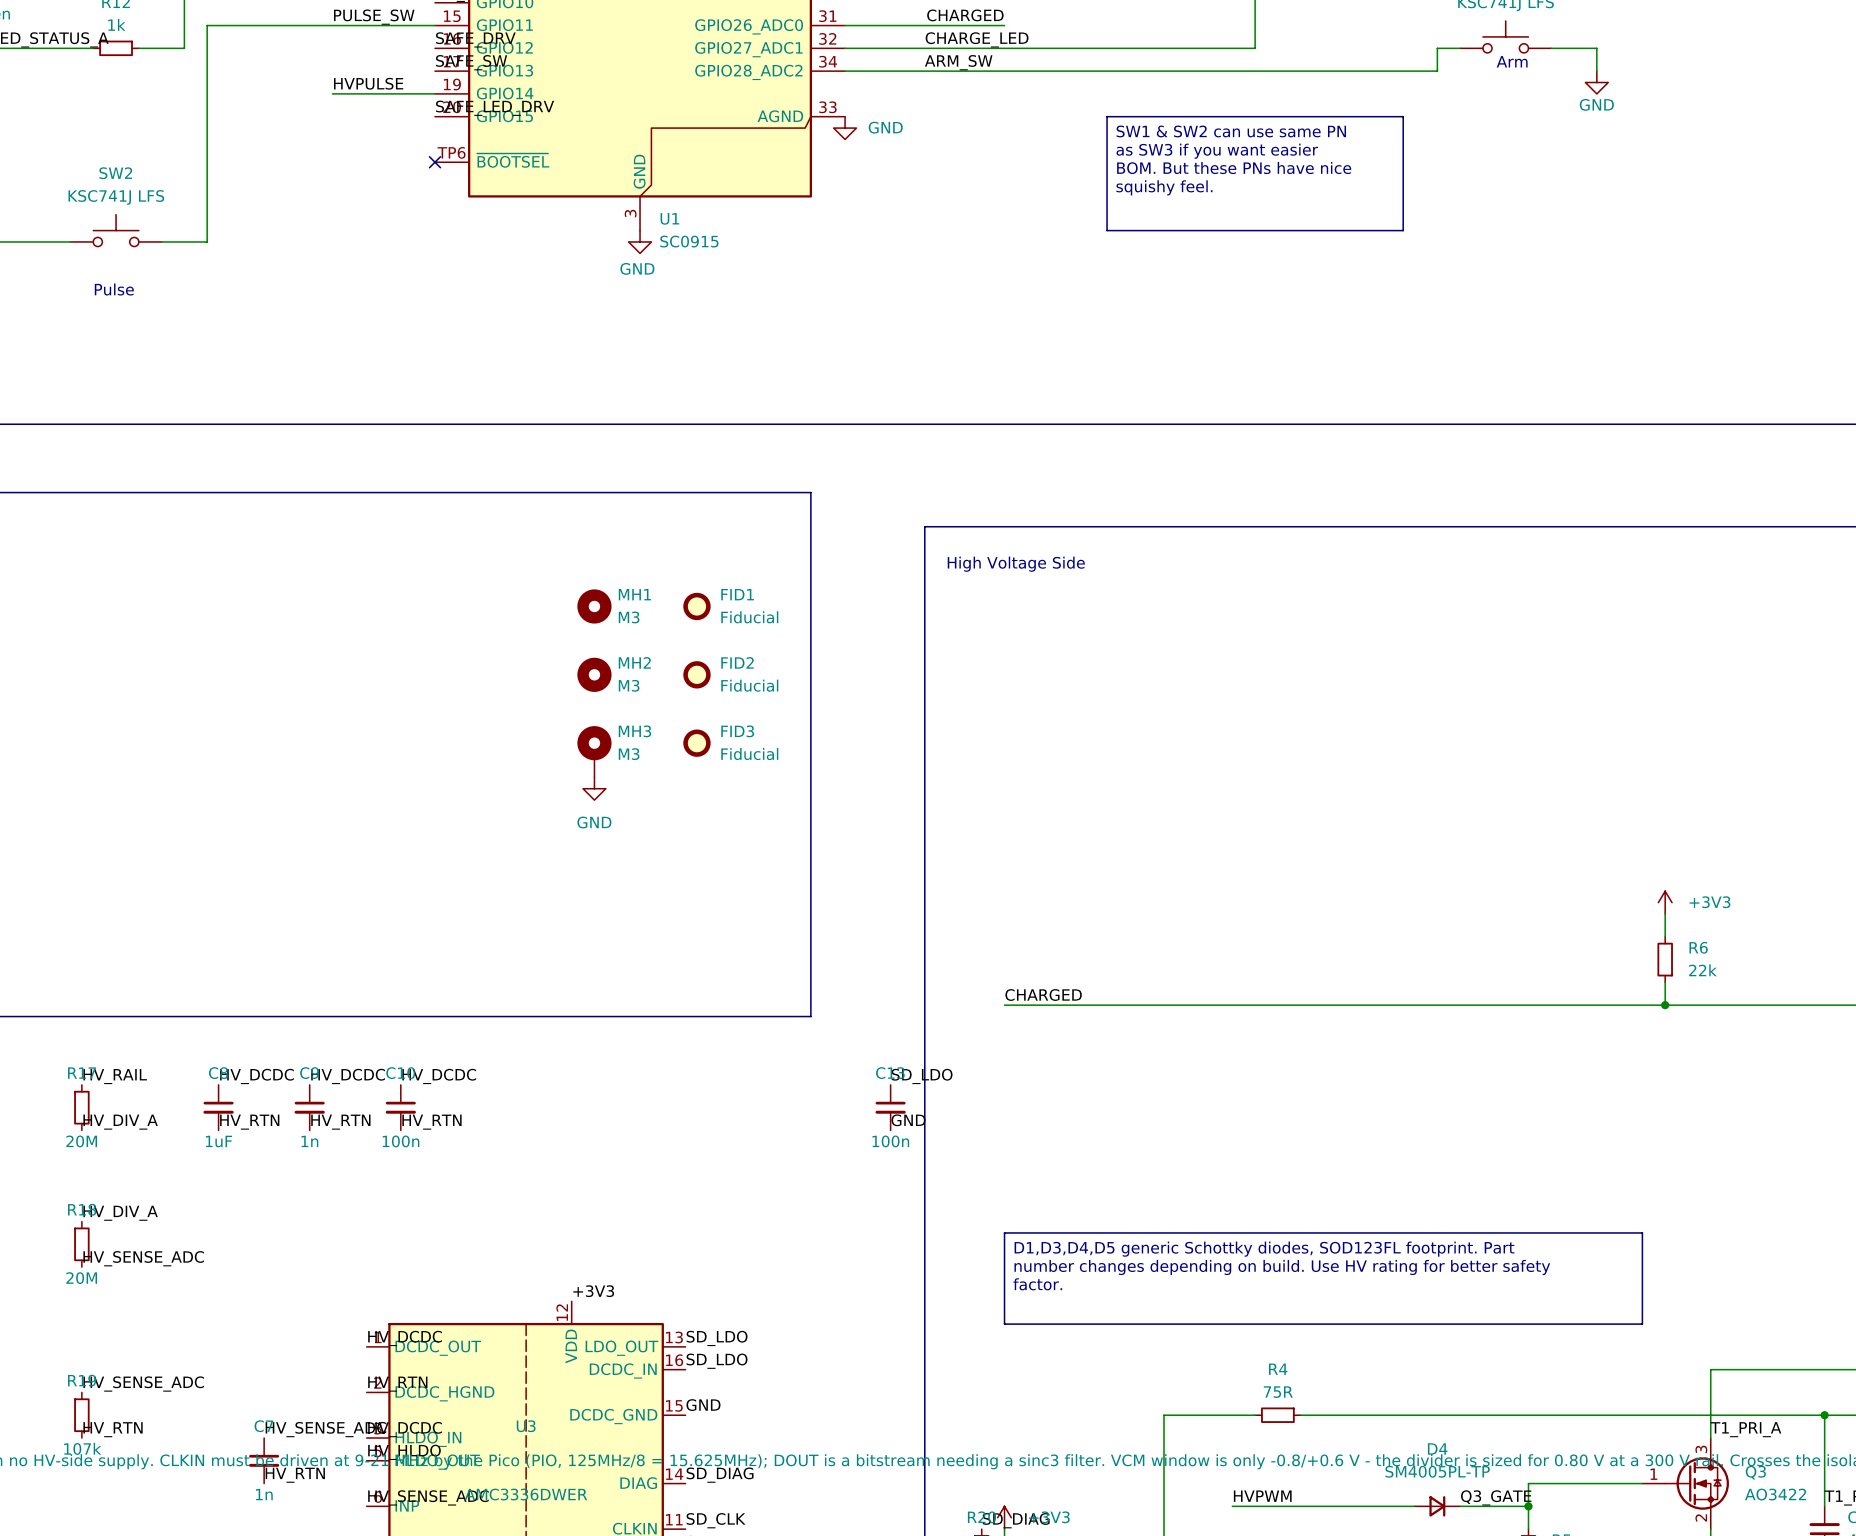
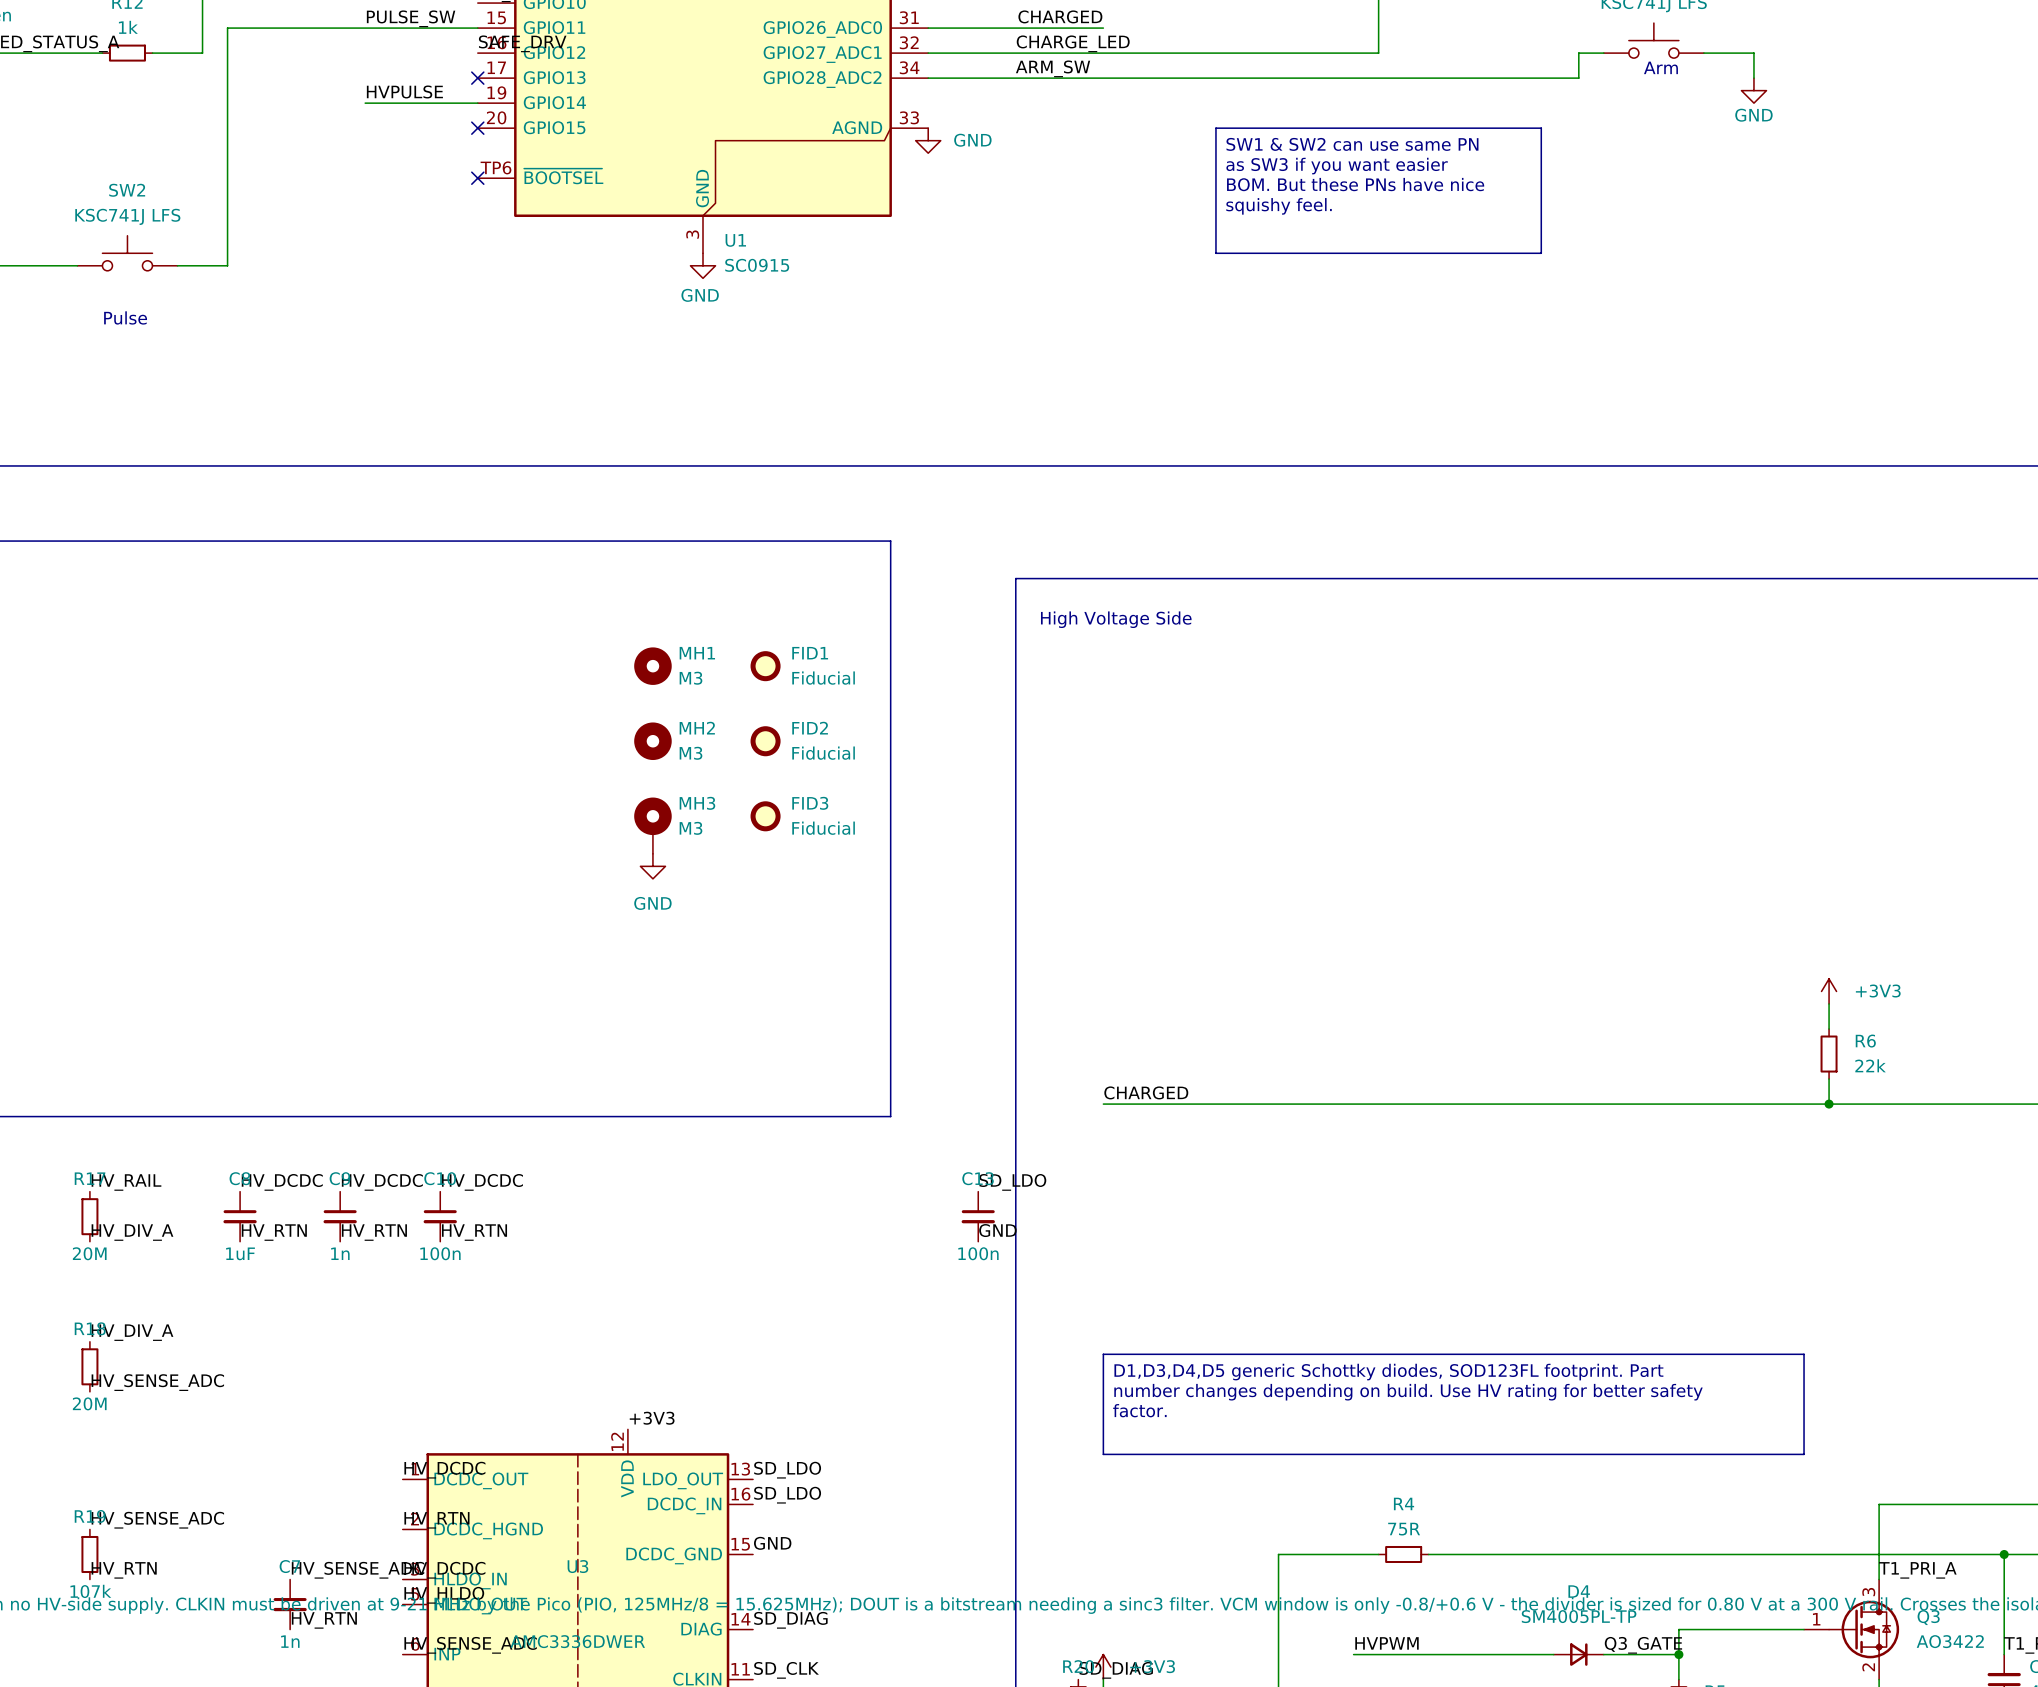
label: SAFE_SW (471, 62) -> none
no-connect mark: none -> (477, 78)
label: SAFE_LED_DRV (495, 108) -> none
no-connect mark: none -> (477, 128)

